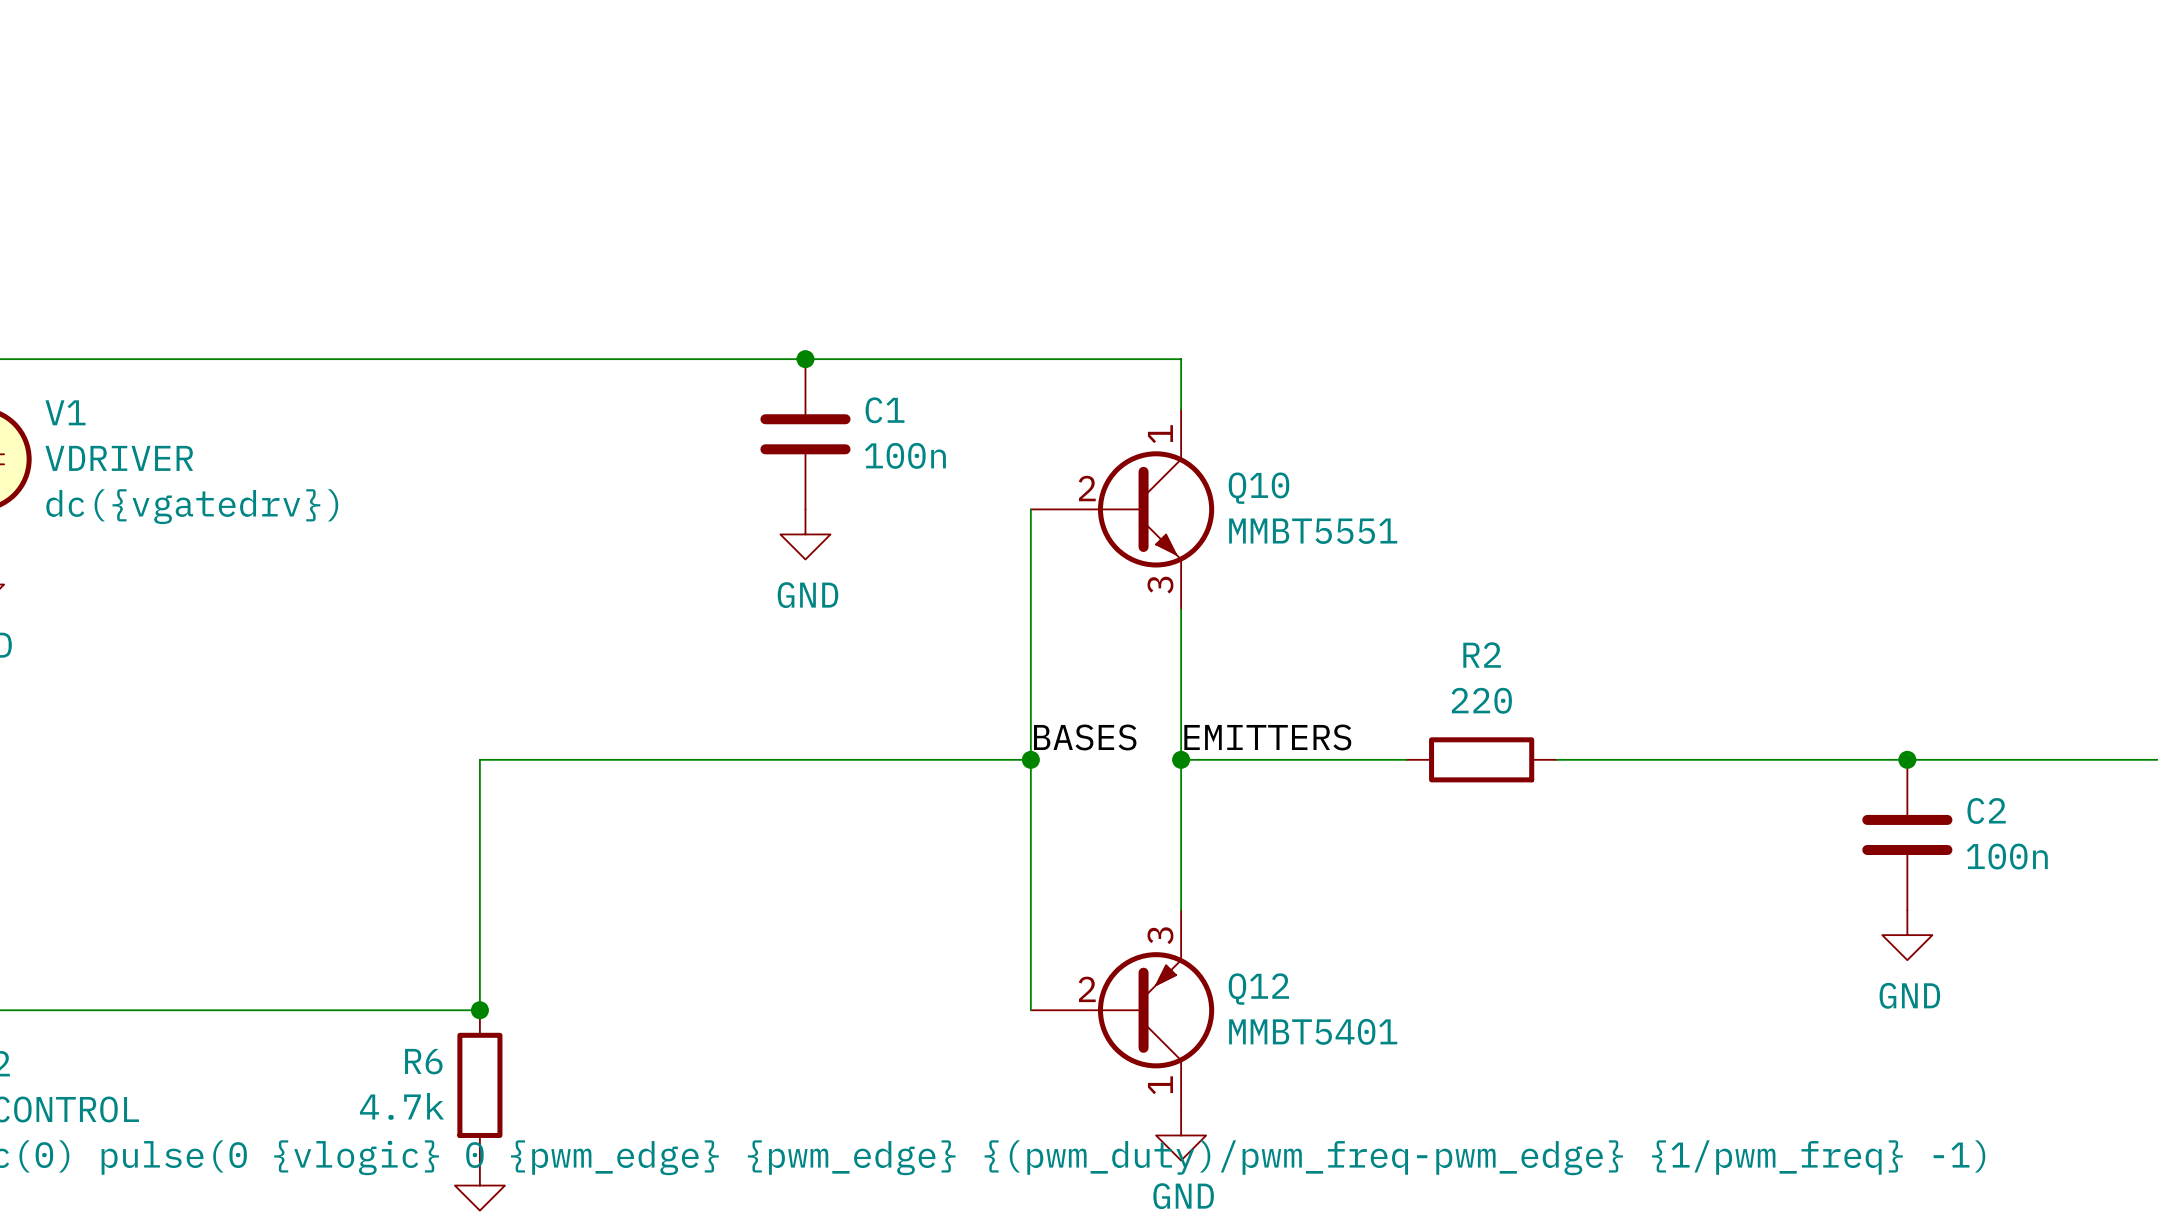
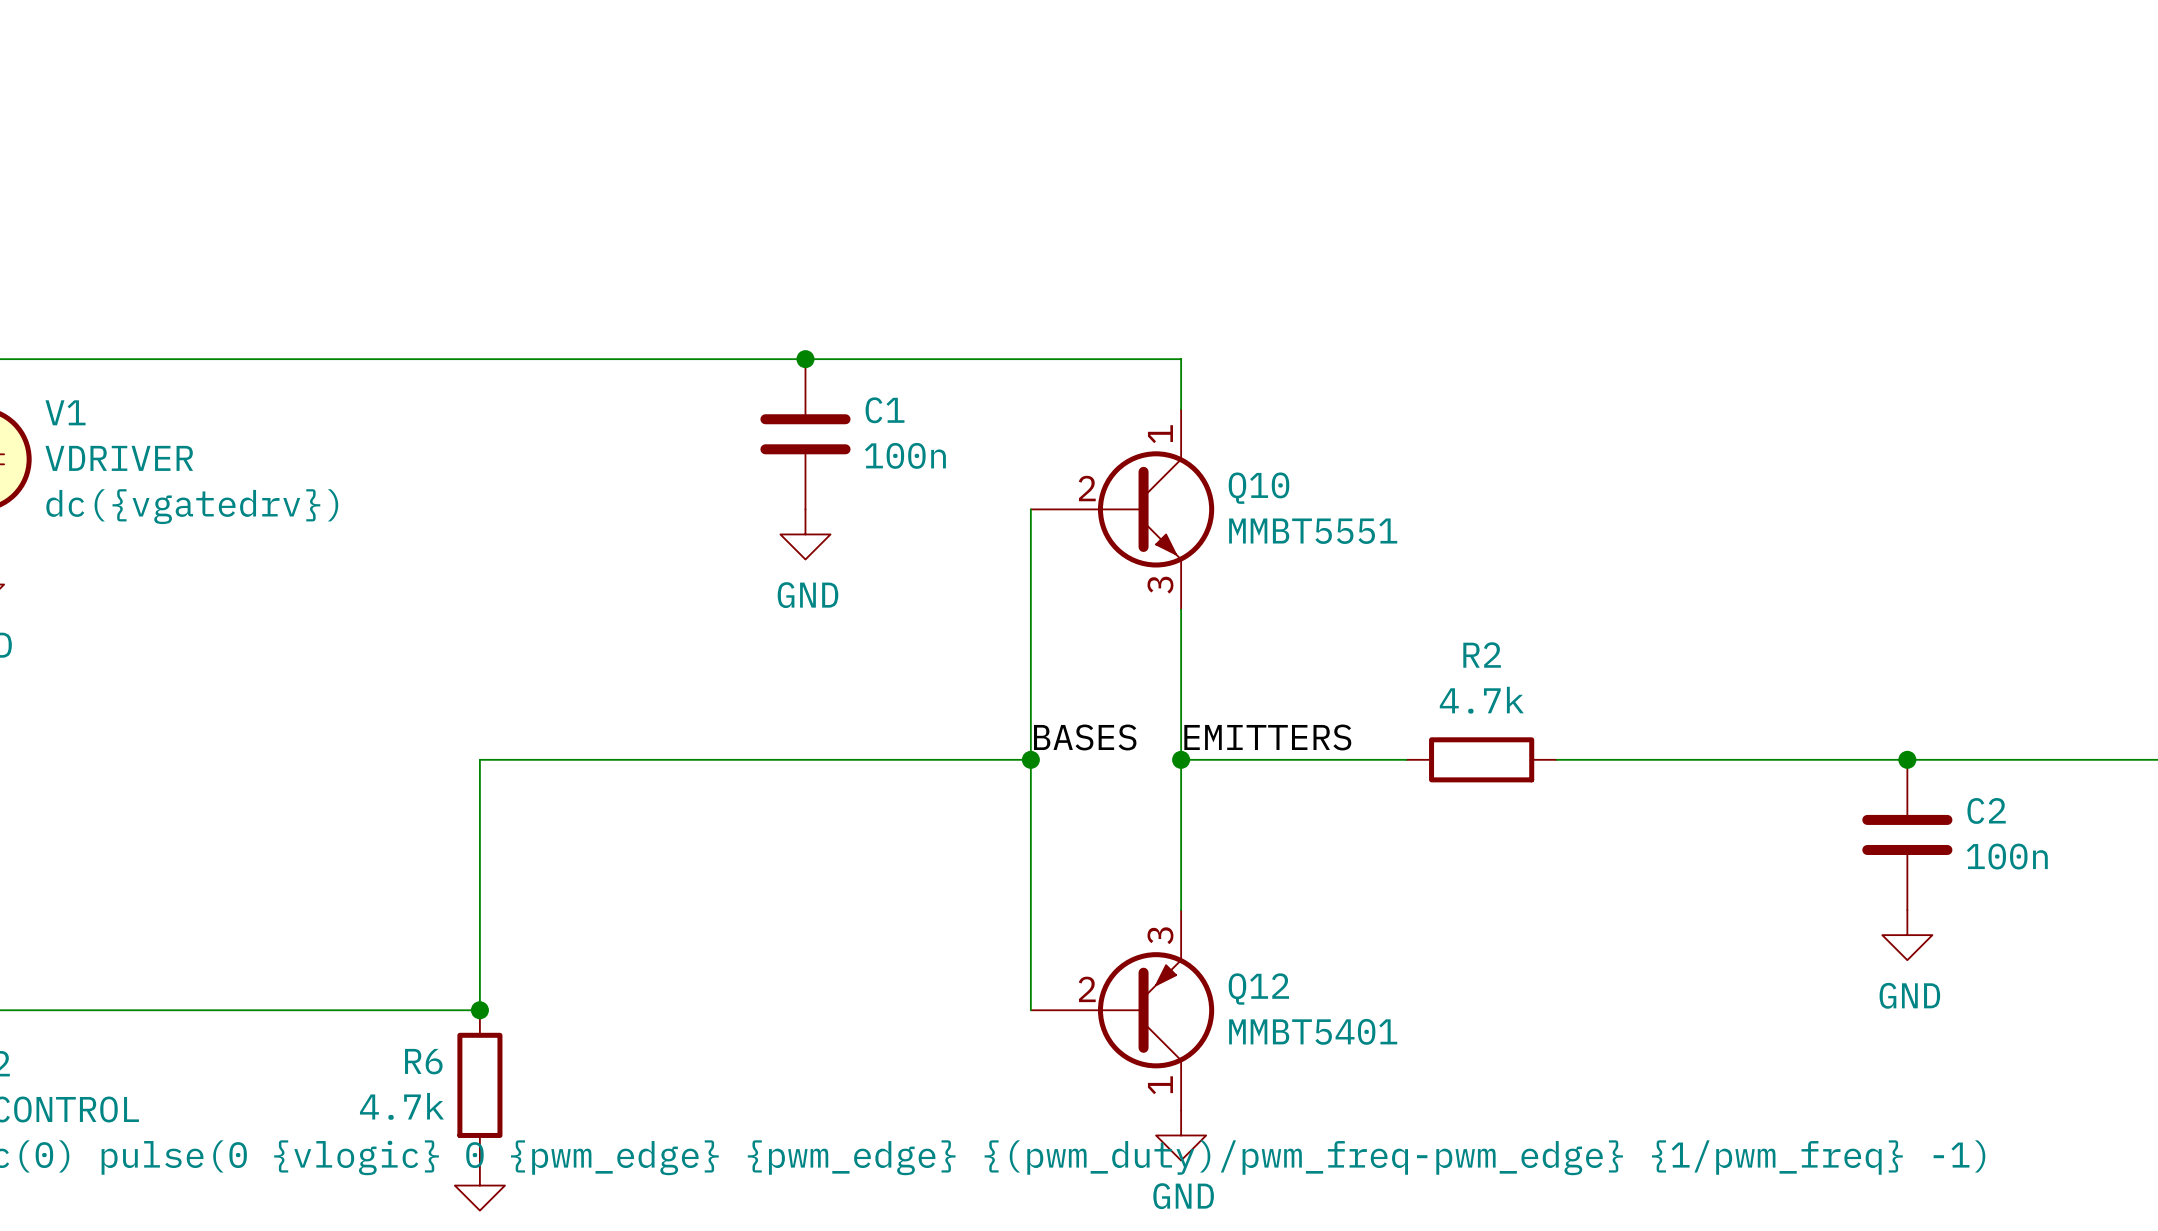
R2 value: 220 (1481, 700) -> 4.7k (1481, 700)

